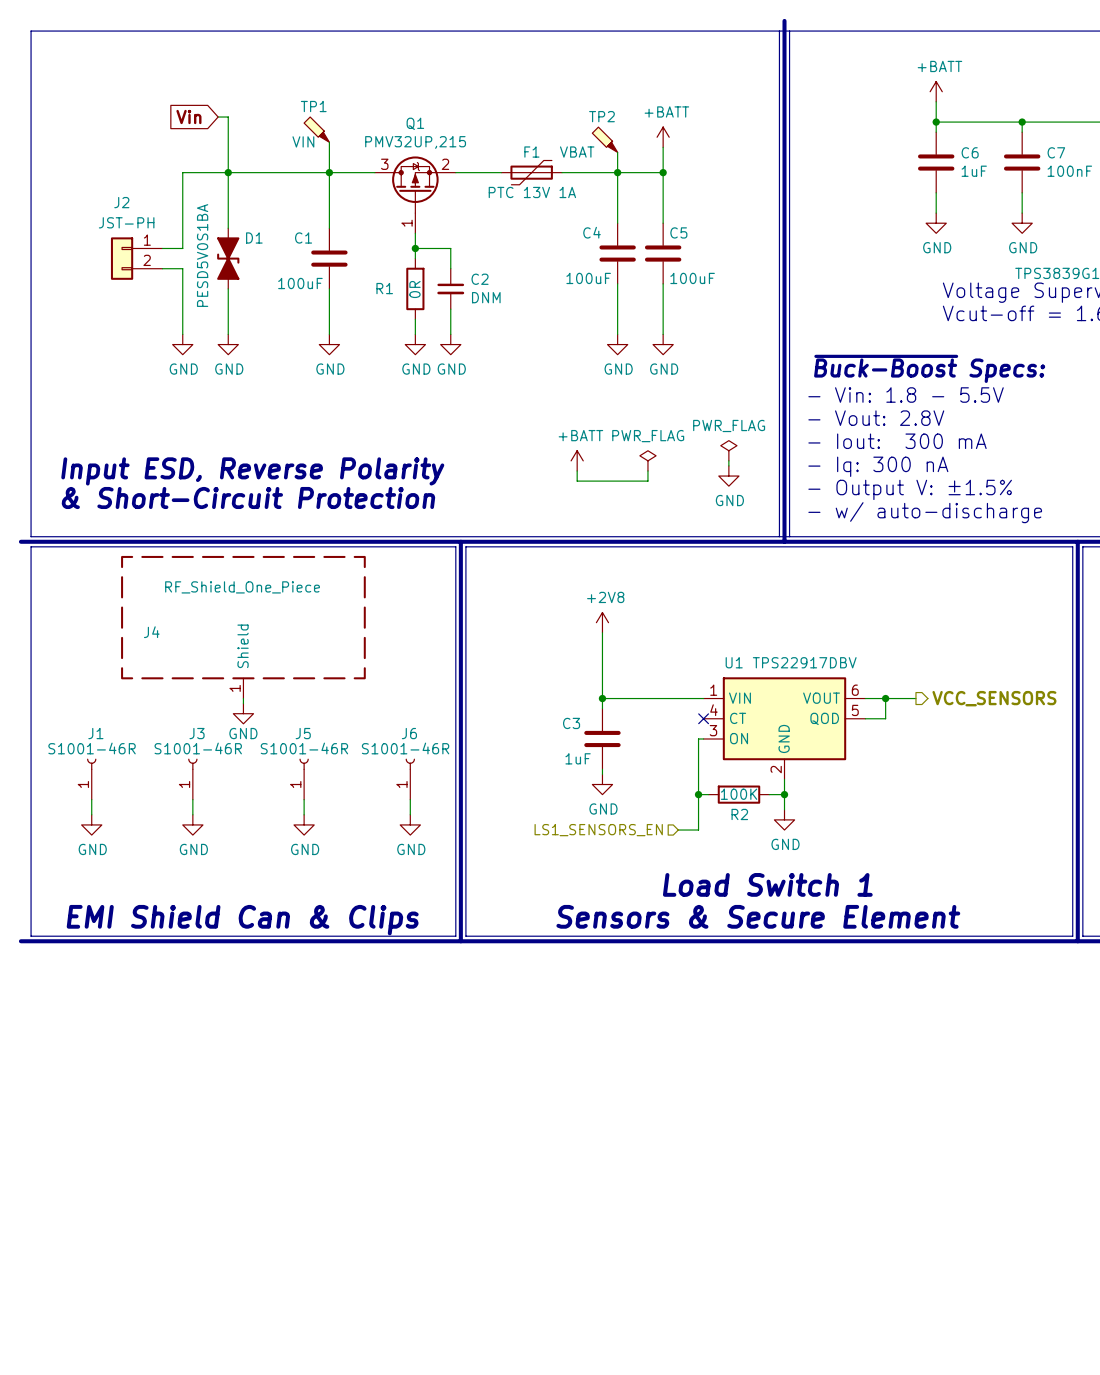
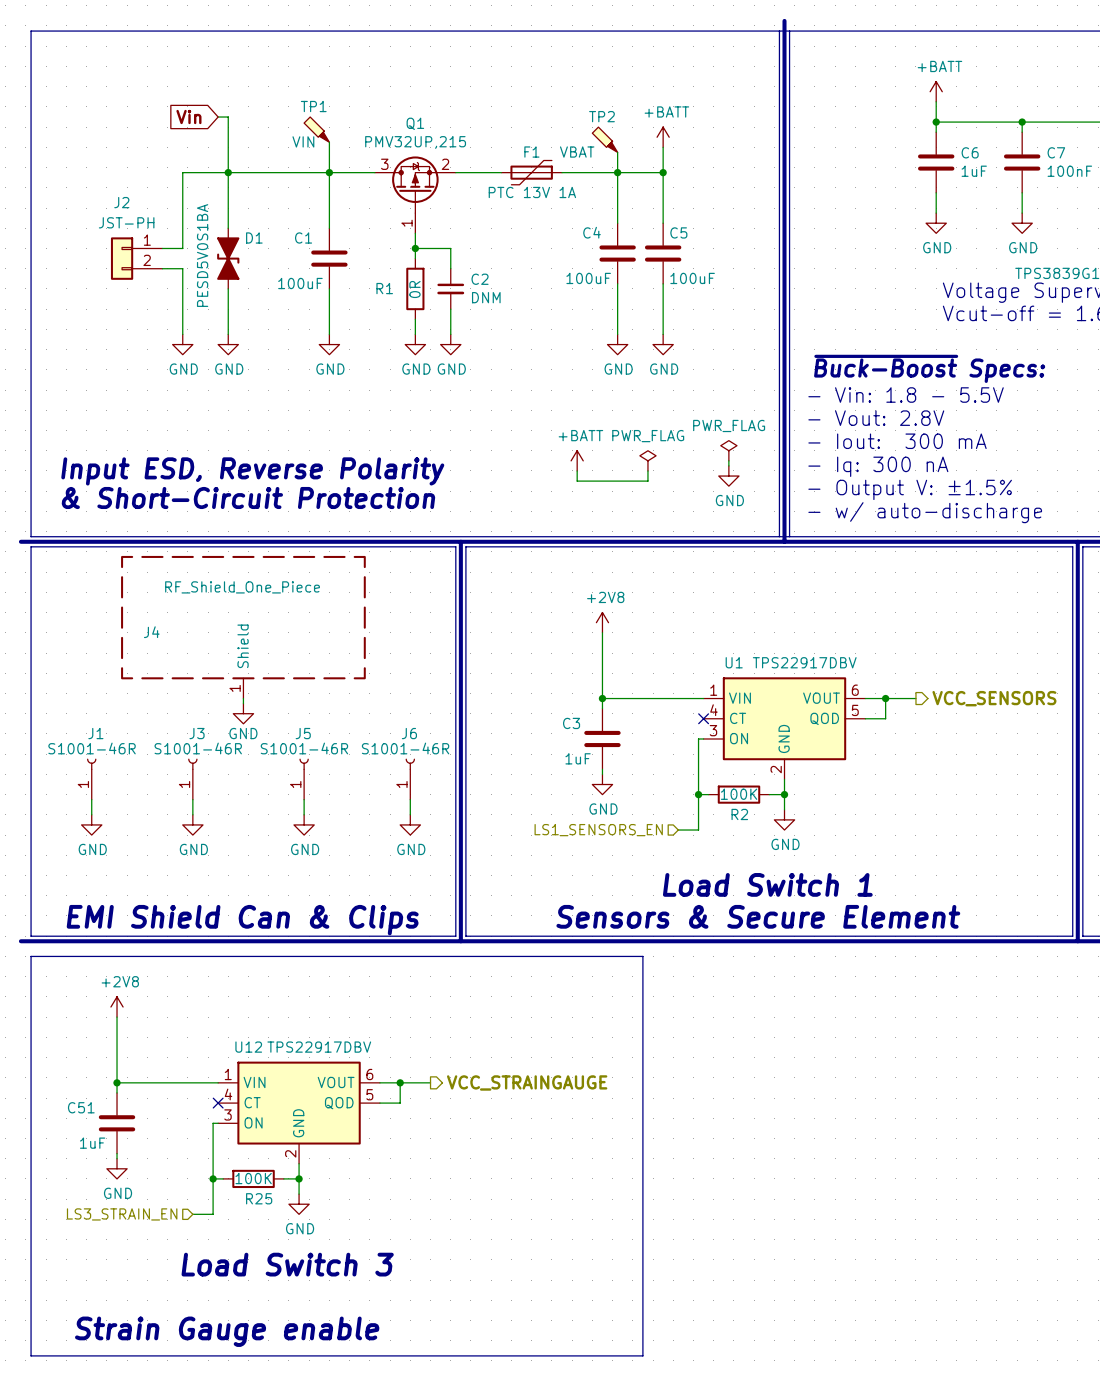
line: none -> (31, 956) (642, 956) (642, 1355) (31, 1355) (31, 956)
power symbol: none -> +2V8 (117, 1007)
wire: none -> (117, 1017) (117, 1092)
wire: none -> (117, 1082) (218, 1082)
junction: none -> (117, 1082)
wire: none -> (379, 1082) (430, 1082)
wire: none -> (400, 1082) (400, 1103) (379, 1103)
junction: none -> (400, 1082)
hierarchical label: none -> VCC_STRAINGAUGE (527, 1082)
no-connect mark: none -> (218, 1103)
U12: none -> TPS22917DBV (299, 1112)
C51: none -> 1uF (117, 1123)
wire: none -> (218, 1123) (213, 1123) (213, 1214) (192, 1214)
wire: none -> (117, 1153) (117, 1158)
wire: none -> (299, 1163) (299, 1194)
power symbol: none -> GND (117, 1168)
wire: none -> (213, 1178) (223, 1178)
junction: none -> (213, 1178)
R25: none -> 100K (253, 1178)
wire: none -> (283, 1178) (299, 1178)
junction: none -> (299, 1178)
power symbol: none -> GND (299, 1204)
hierarchical label: none -> LS3_STRAIN_EN (122, 1214)
text: none -> Load Switch 3 (287, 1264)
text: none -> Strain Gauge enable (227, 1331)

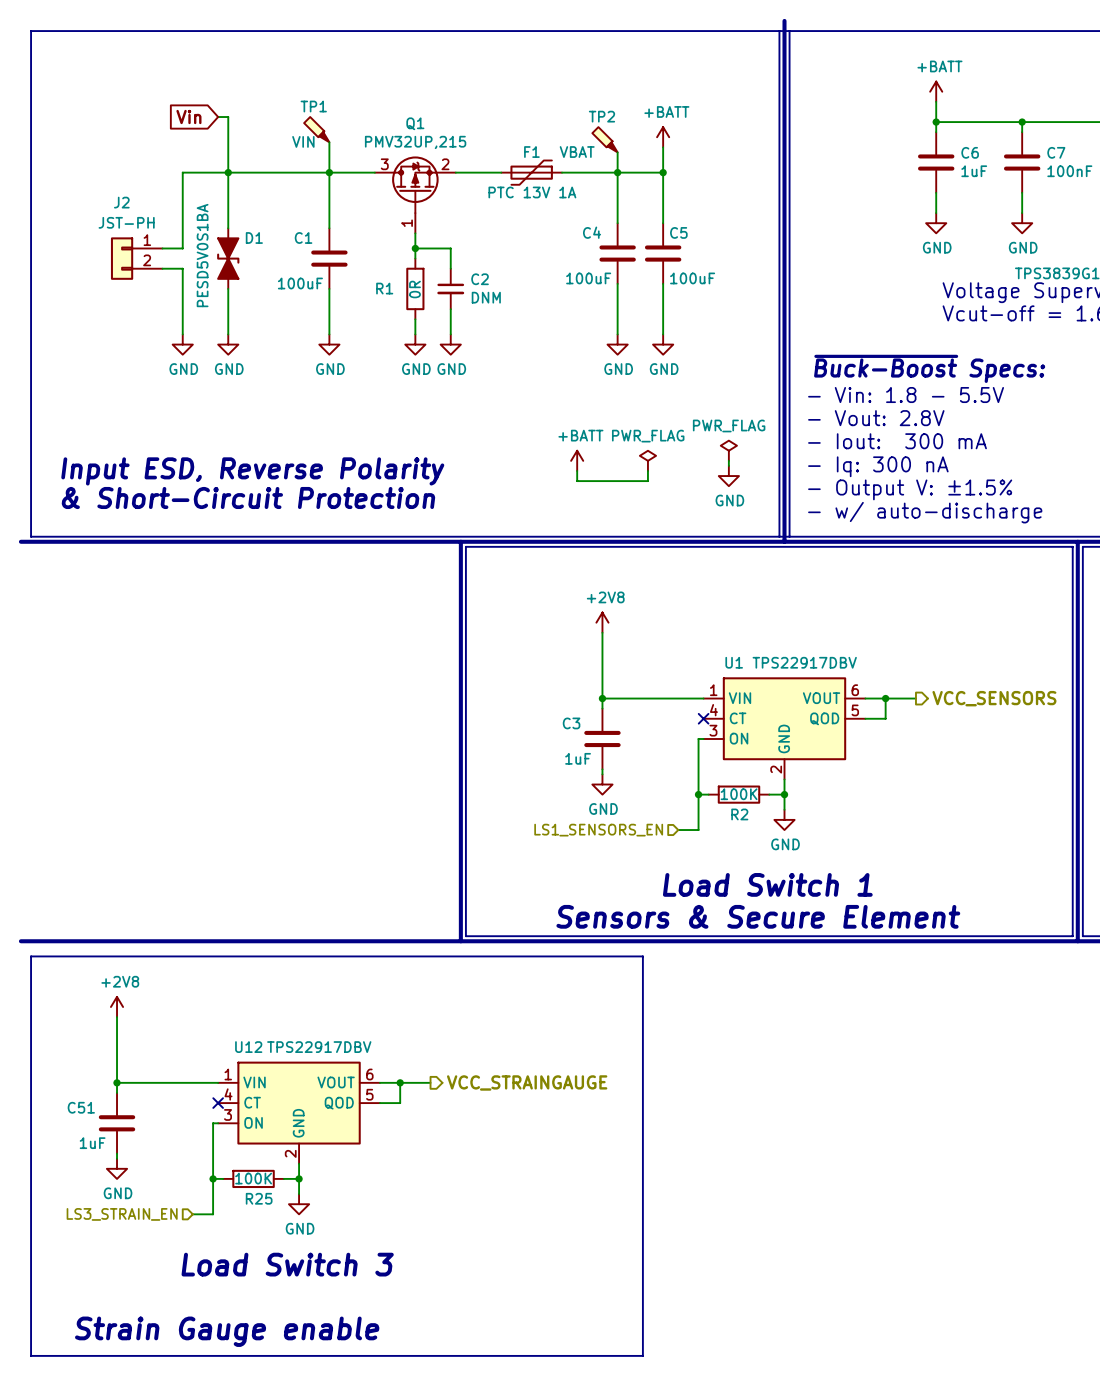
line: (31, 546) (31, 936) (455, 936) (455, 546) (31, 546) -> none
J4: RF_Shield_One_Piece (243, 627) -> none
wire: (243, 698) (243, 703) -> none
power symbol: GND (243, 713) -> none
J1: S1001-46R (91, 779) -> none
J3: S1001-46R (192, 779) -> none
J5: S1001-46R (304, 779) -> none
J6: S1001-46R (410, 779) -> none
wire: (91, 799) (91, 814) -> none
wire: (192, 799) (192, 814) -> none
wire: (304, 799) (304, 814) -> none
wire: (410, 799) (410, 814) -> none
power symbol: GND (91, 824) -> none
power symbol: GND (192, 824) -> none
power symbol: GND (304, 824) -> none
power symbol: GND (410, 824) -> none
text: EMI Shield Can & Clips (242, 920) -> none

